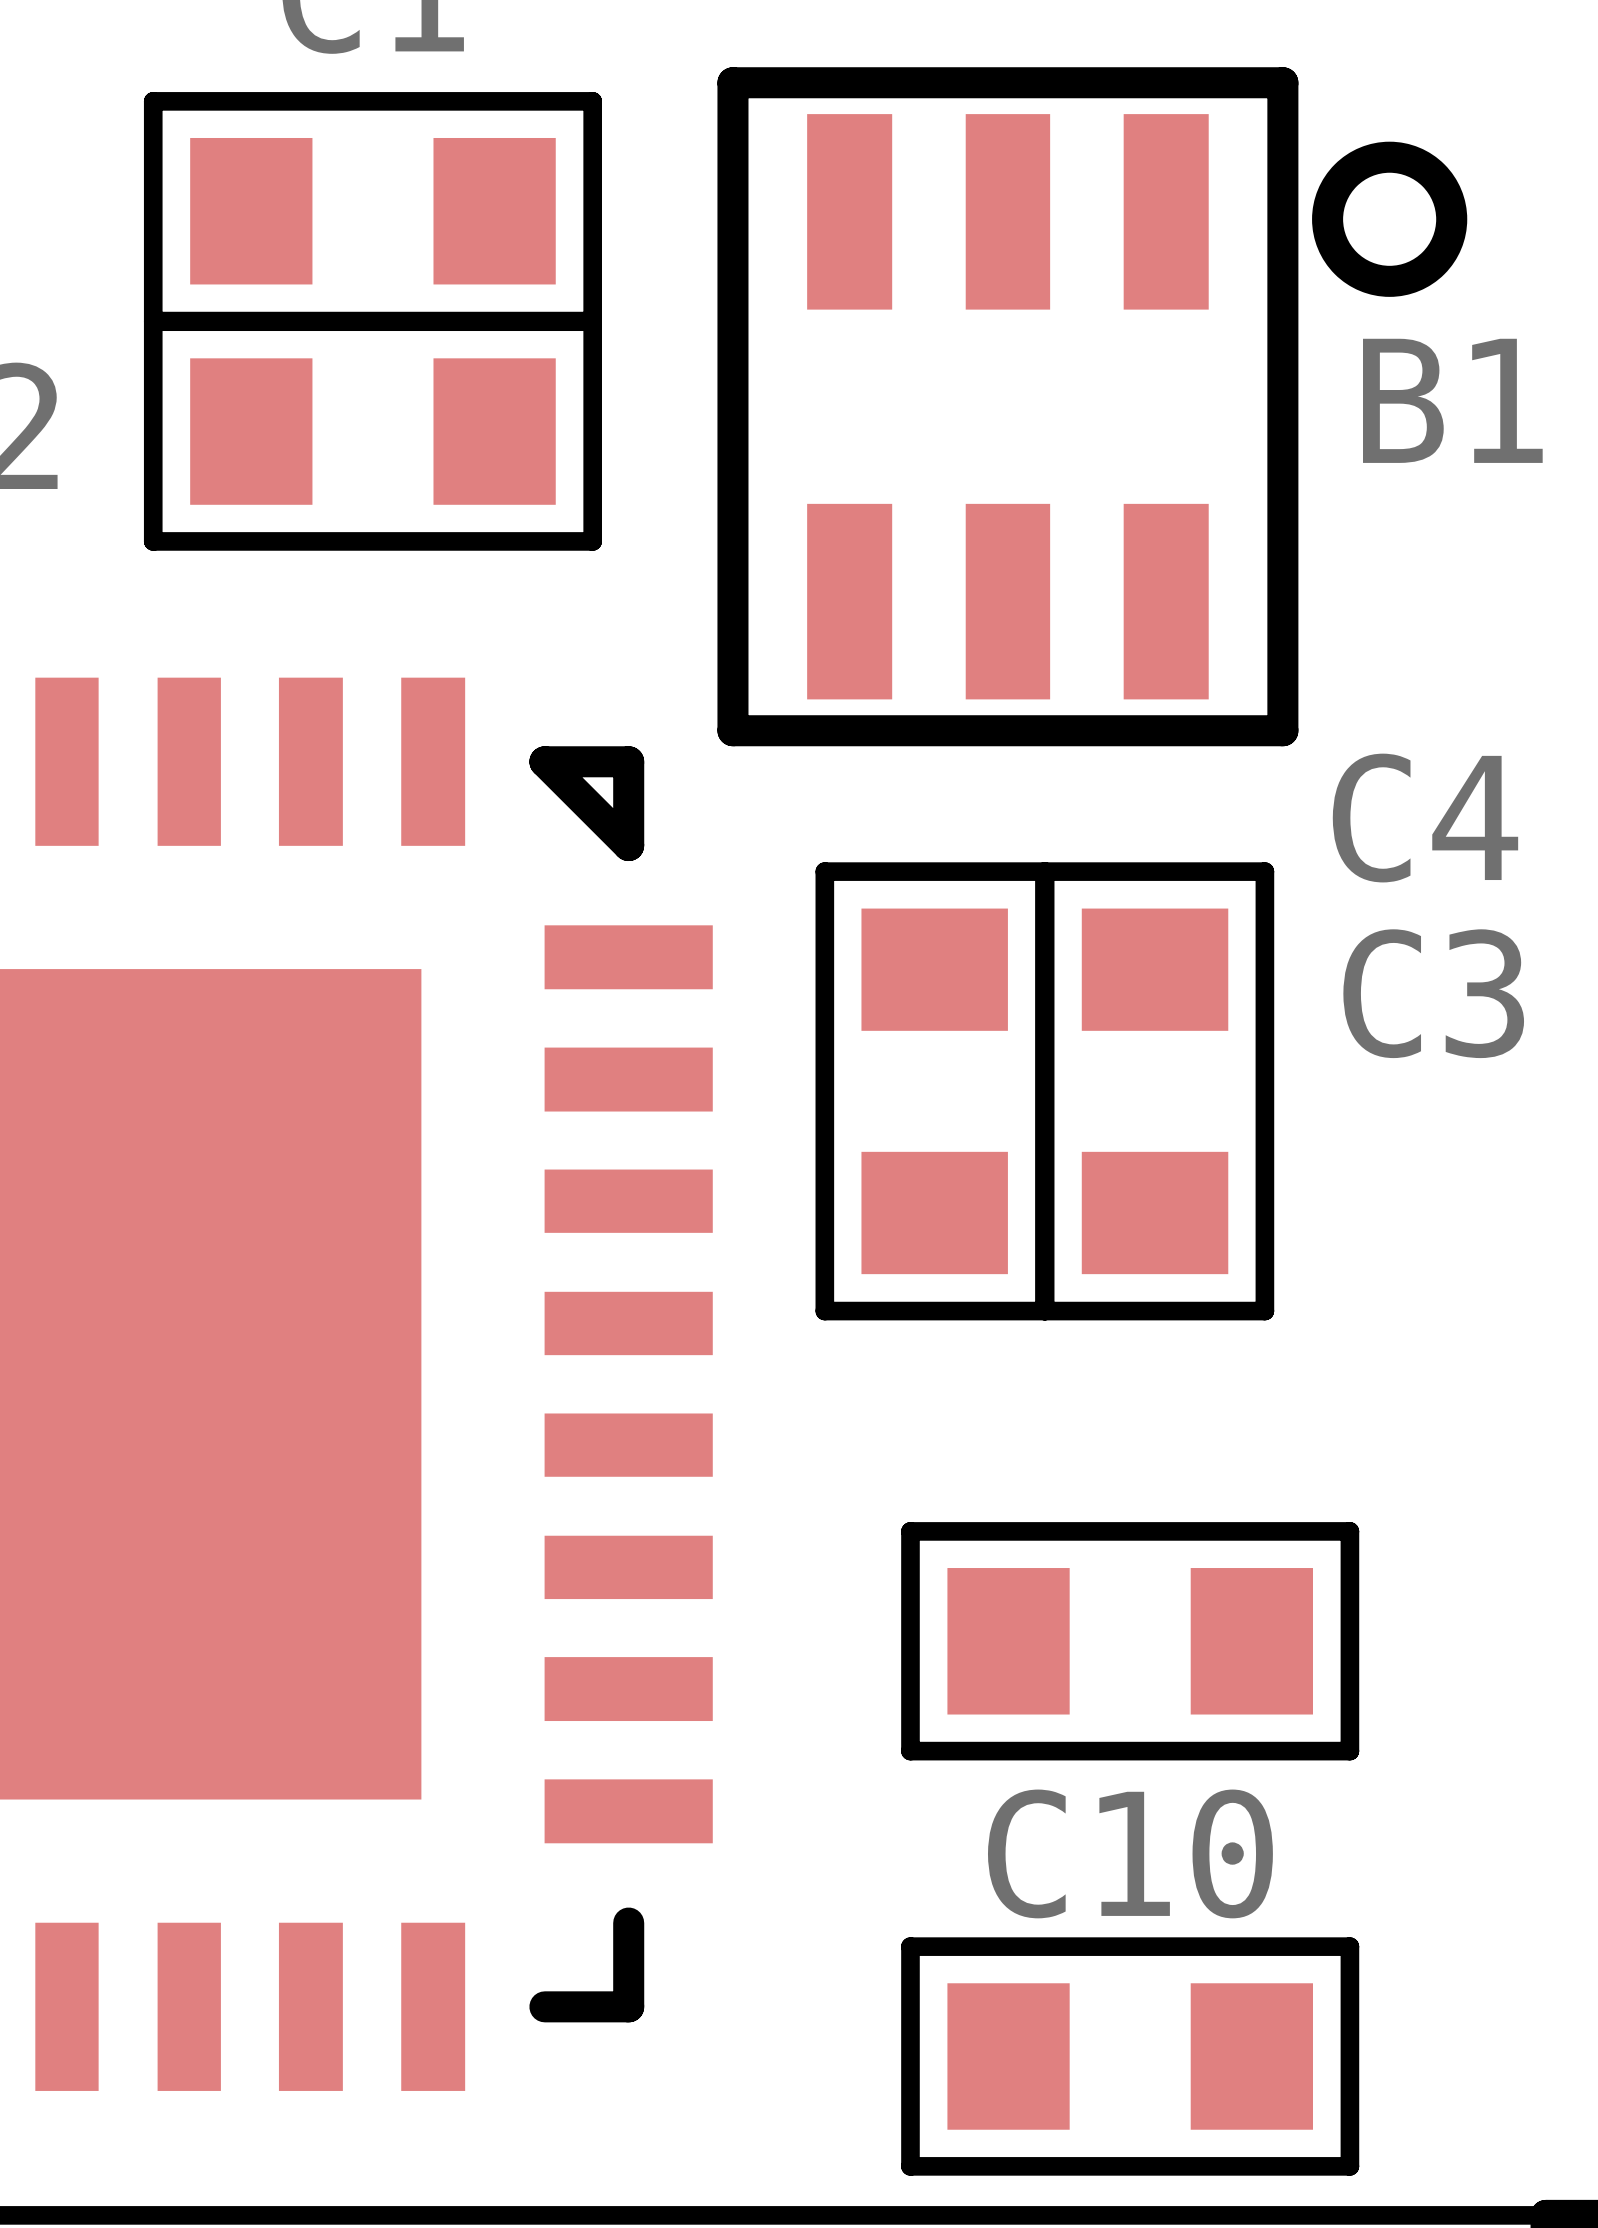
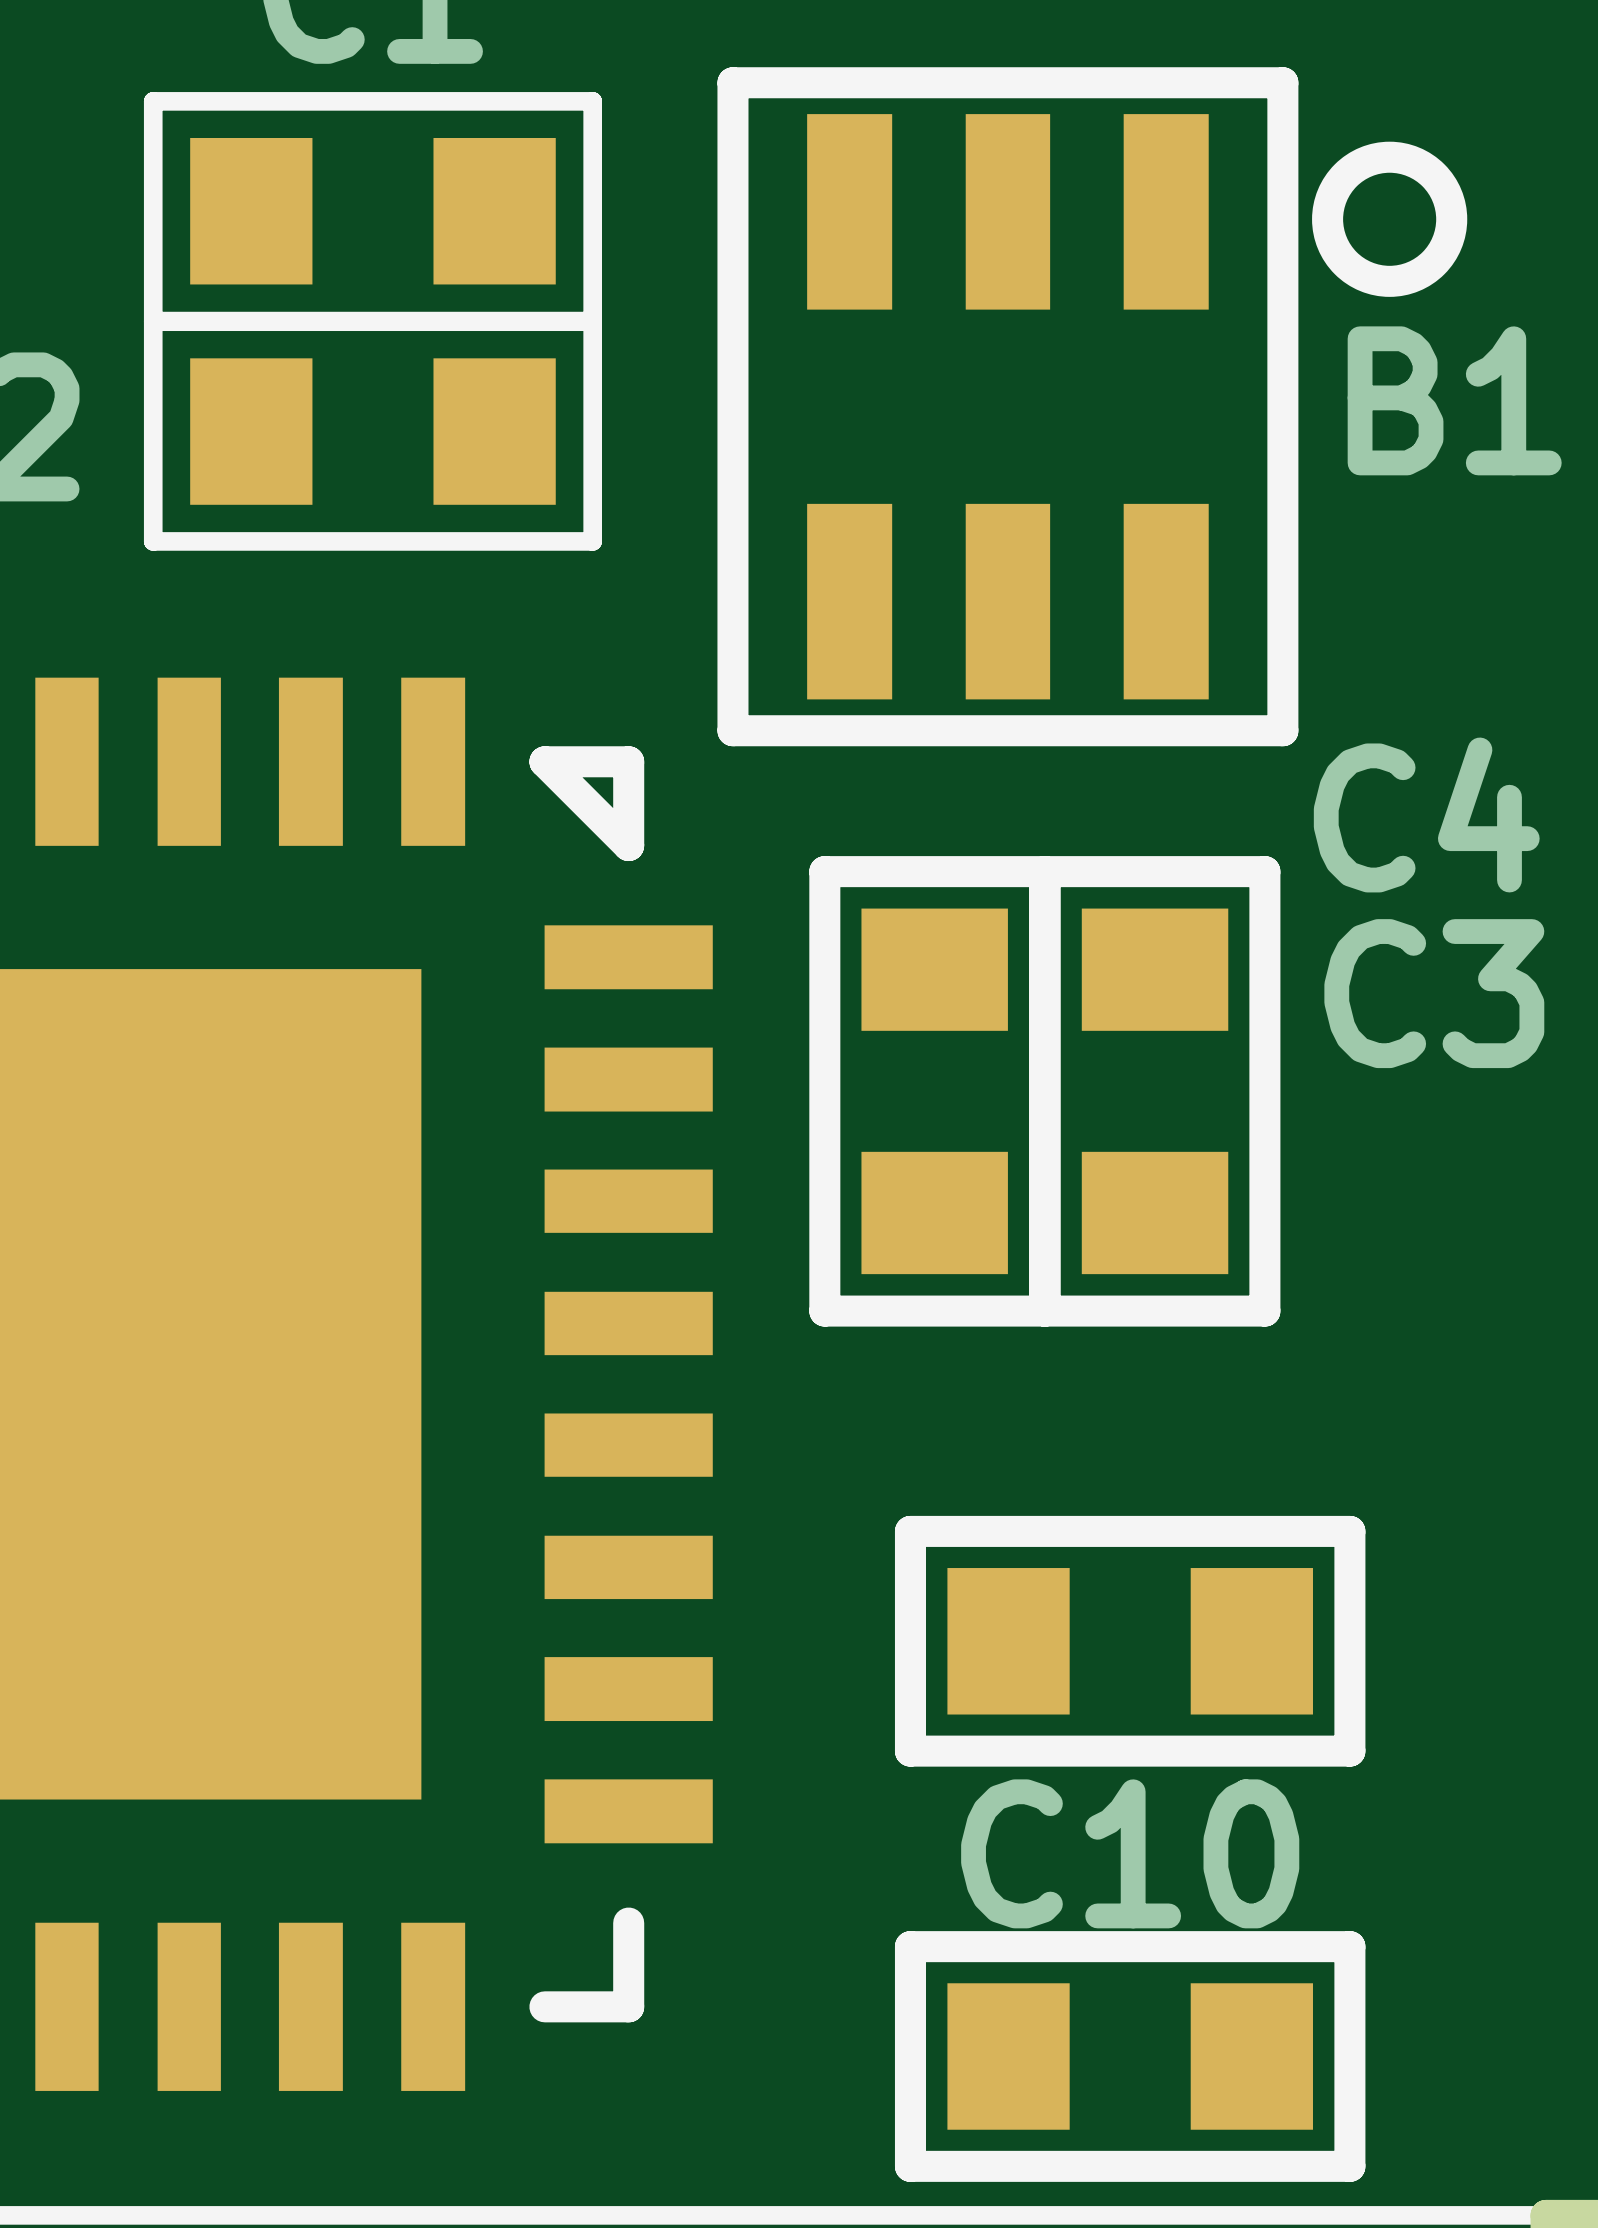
C4 footprint: [815, 862, 1054, 1321] -> [809, 856, 1061, 1327]
C3 footprint: [1035, 862, 1275, 1321] -> [1029, 856, 1281, 1327]
C10 footprint: [901, 1522, 1360, 1761] -> [894, 1515, 1366, 1767]
part footprint: [901, 1937, 1360, 2176] -> [894, 1931, 1366, 2182]

